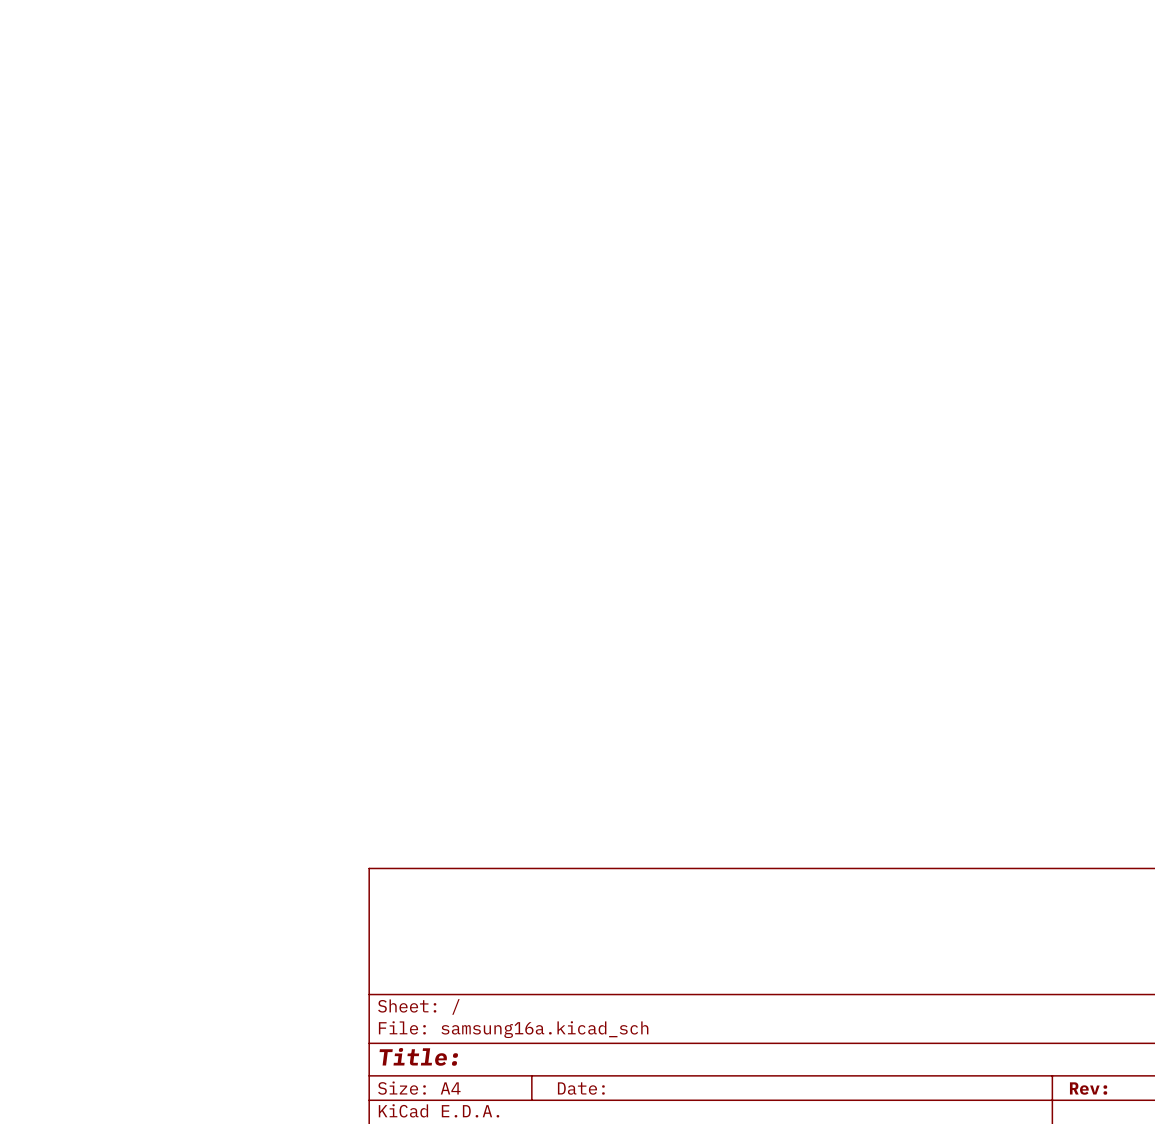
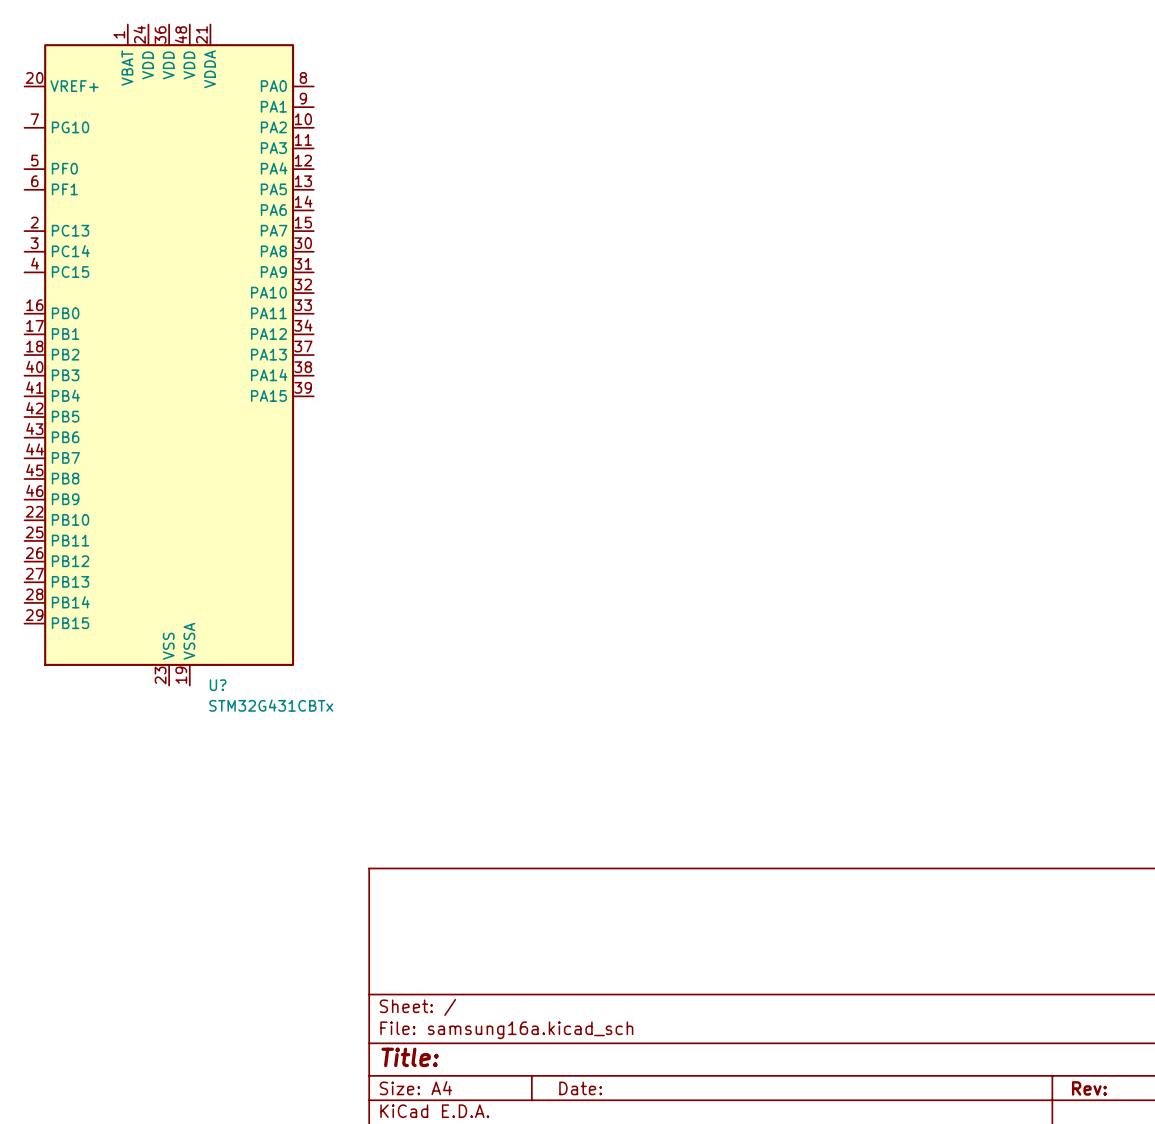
U?: none -> STM32G431CBTx (169, 355)

